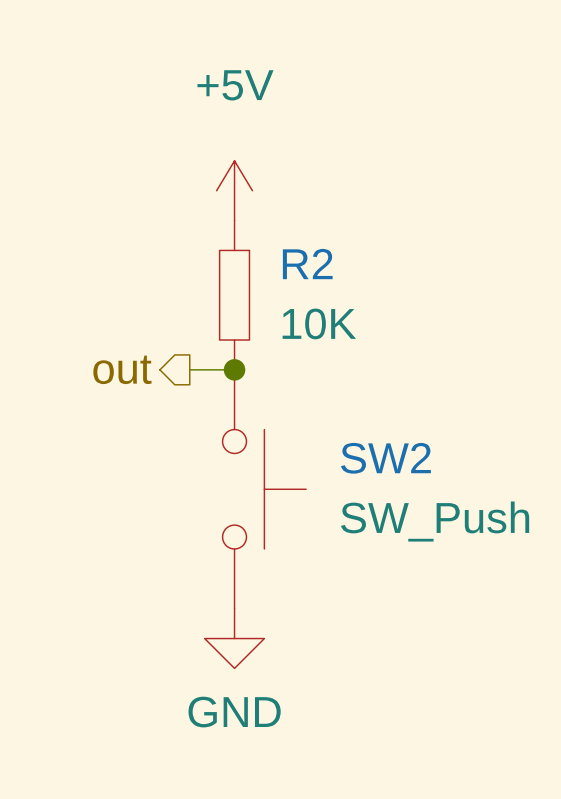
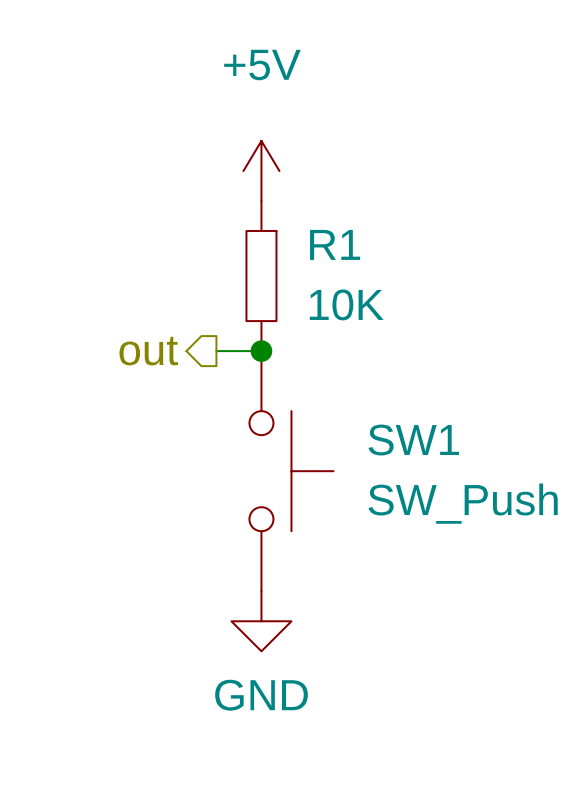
R2 name: R2 (307, 264) -> R1 (335, 244)
SW2 name: SW2 (385, 458) -> SW1 (413, 440)

